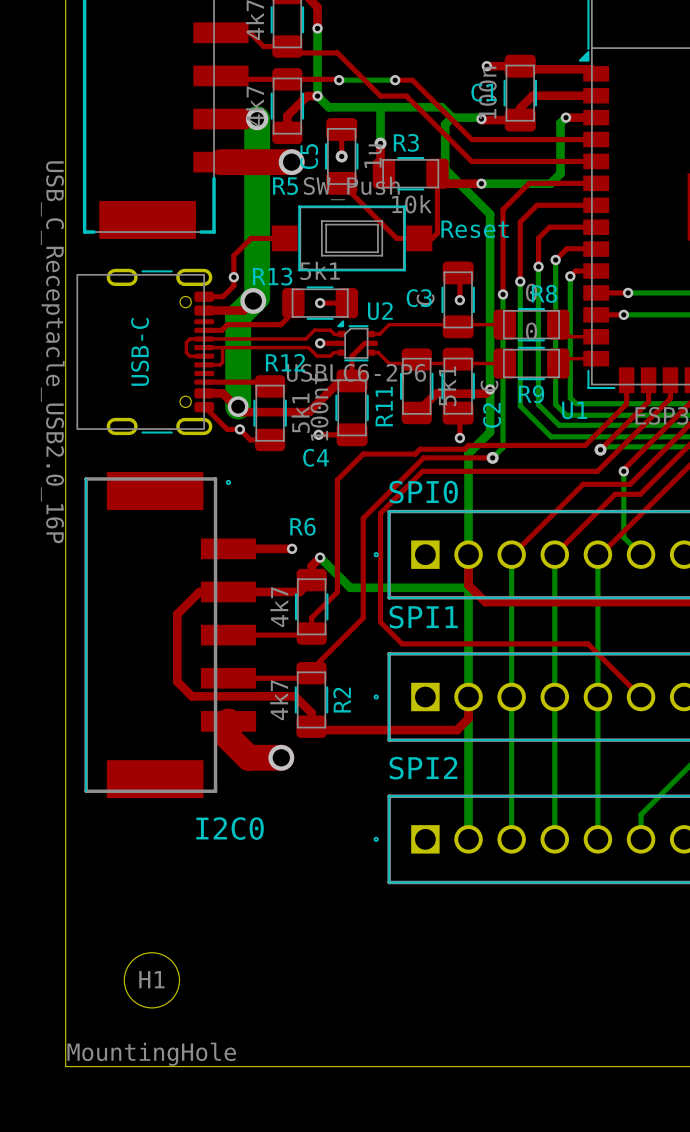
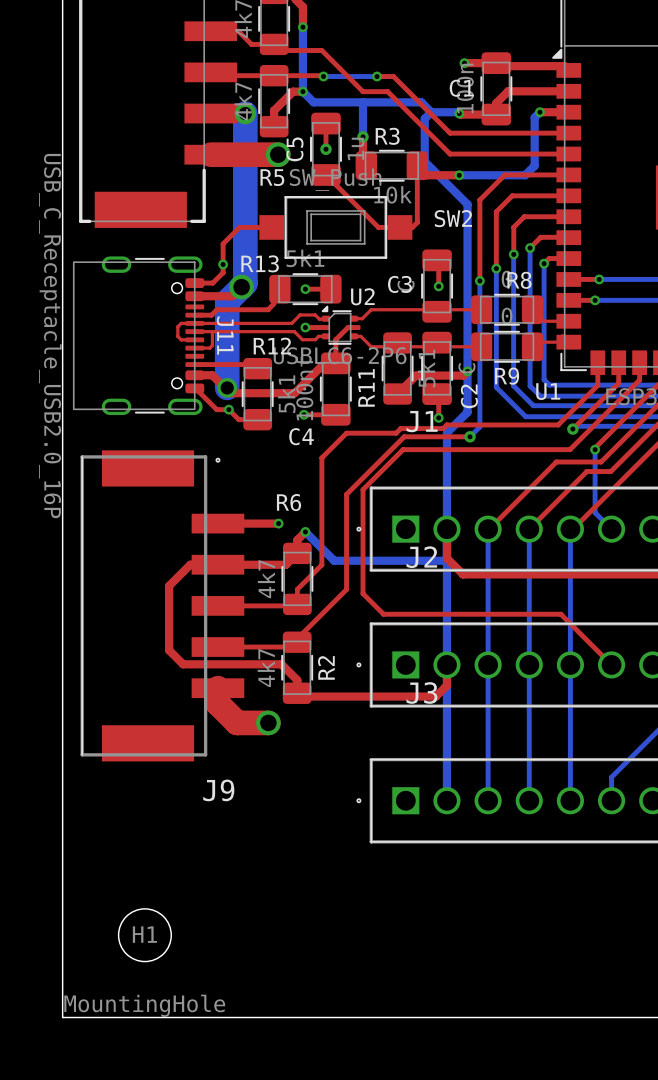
Reset name: Reset (475, 229) -> SW2 (453, 218)
USB-C name: USB-C (140, 352) -> J11 (225, 335)
SPI0 name: SPI0 (423, 492) -> J1 (422, 421)
SPI1 name: SPI1 (423, 617) -> J2 (421, 557)
SPI2 name: SPI2 (423, 768) -> J3 (421, 692)
I2C0 name: I2C0 (230, 828) -> J9 (218, 790)

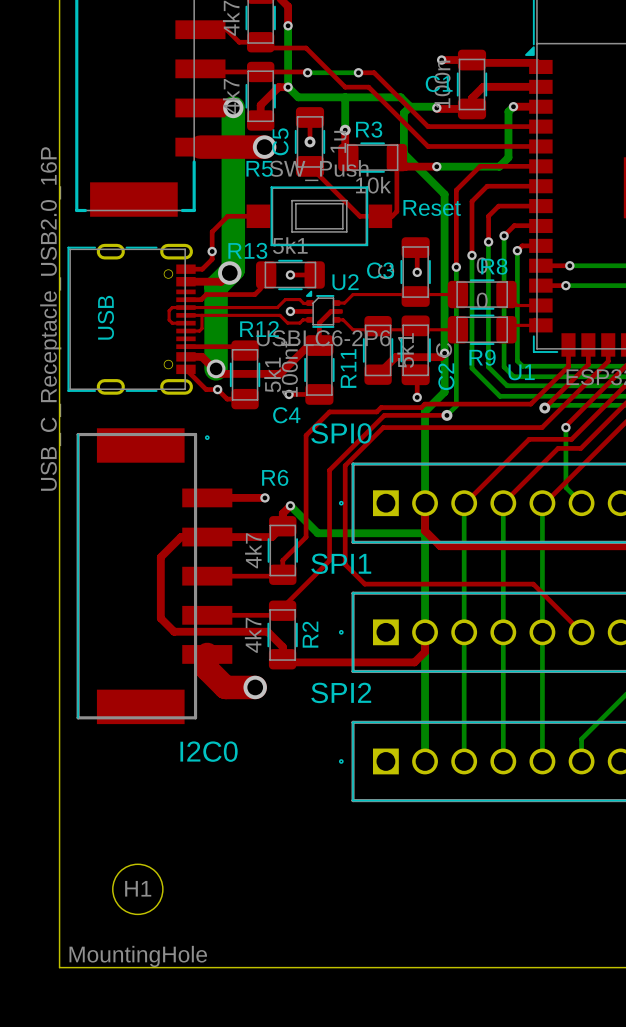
SW2 name: SW2 (453, 218) -> Reset (432, 207)
J11: USB_C_Receptacle_USB2.0_16P (138, 335) -> none
USB: none -> USB_C_Receptacle_USB2.0_16P (131, 319)
J1 name: J1 (422, 421) -> SPI0 (341, 433)
J2 name: J2 (421, 557) -> SPI1 (341, 563)
J3 name: J3 (421, 692) -> SPI2 (341, 692)
J9 name: J9 (218, 790) -> I2C0 (209, 751)

